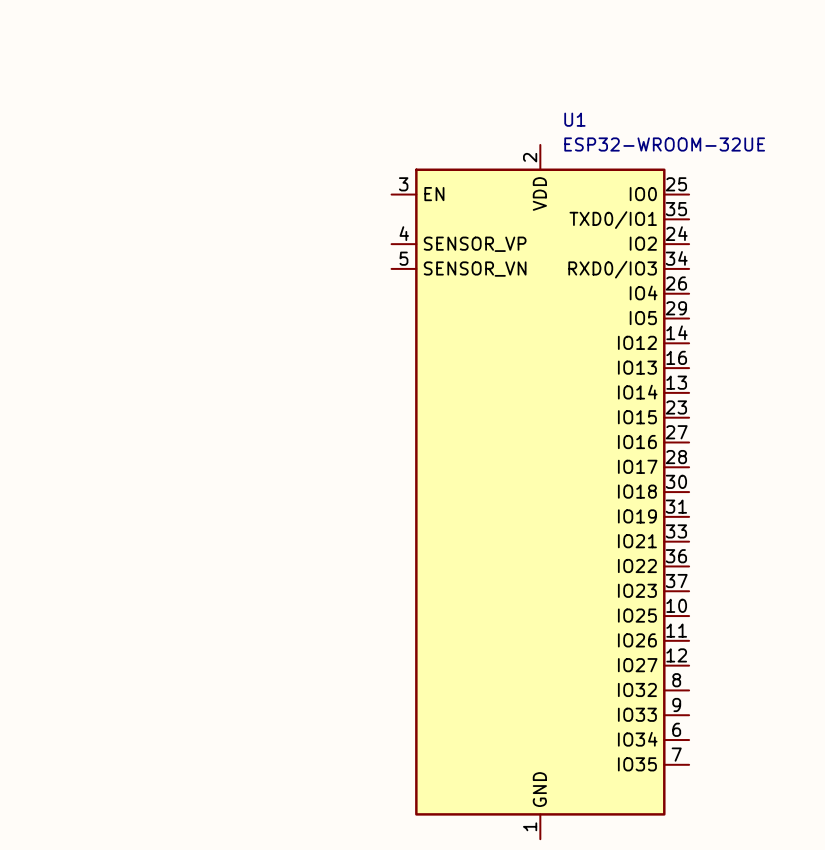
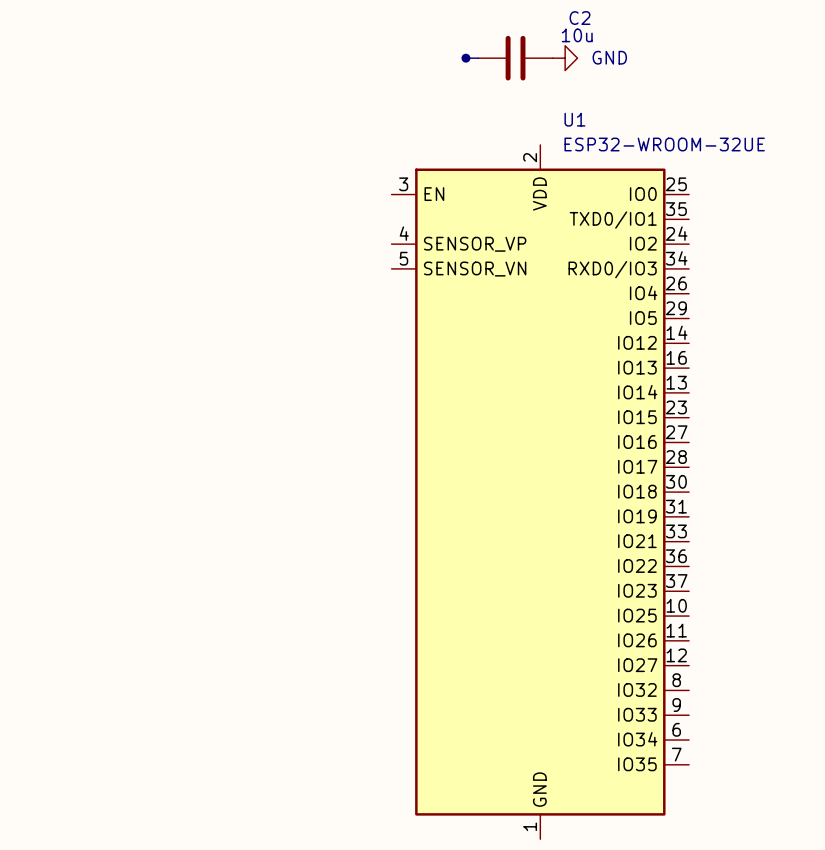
wire: none -> (465, 58) (478, 58)
junction: none -> (465, 58)
C2: none -> 10u (515, 58)
power symbol: none -> GND (565, 58)

